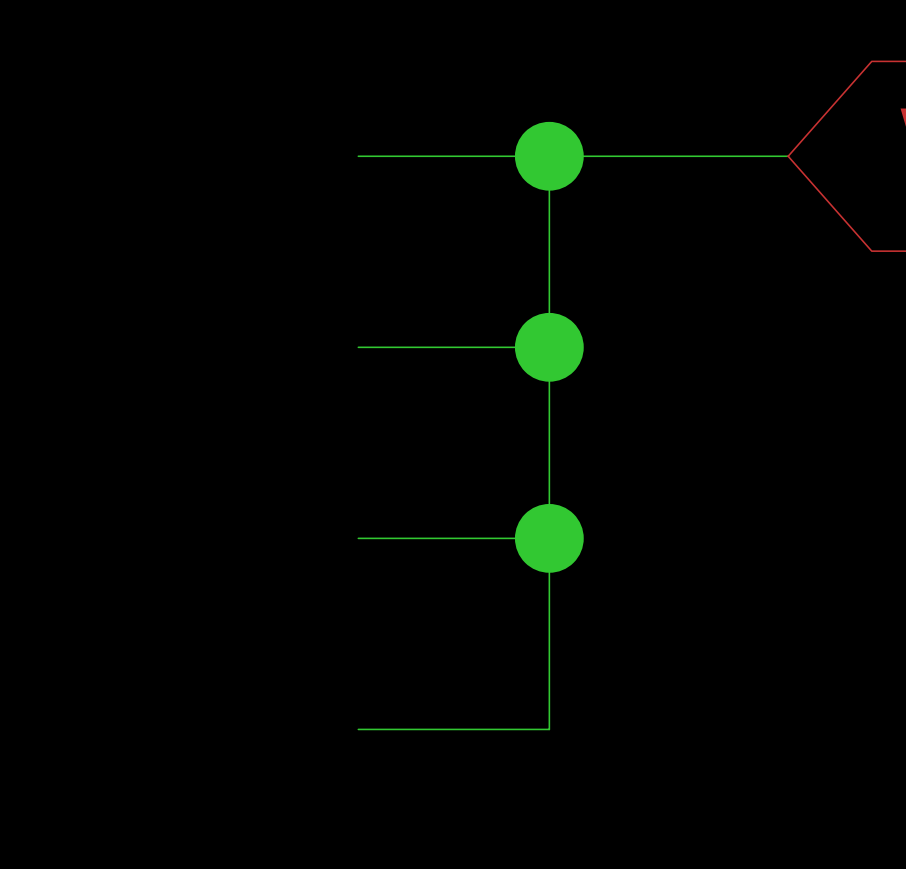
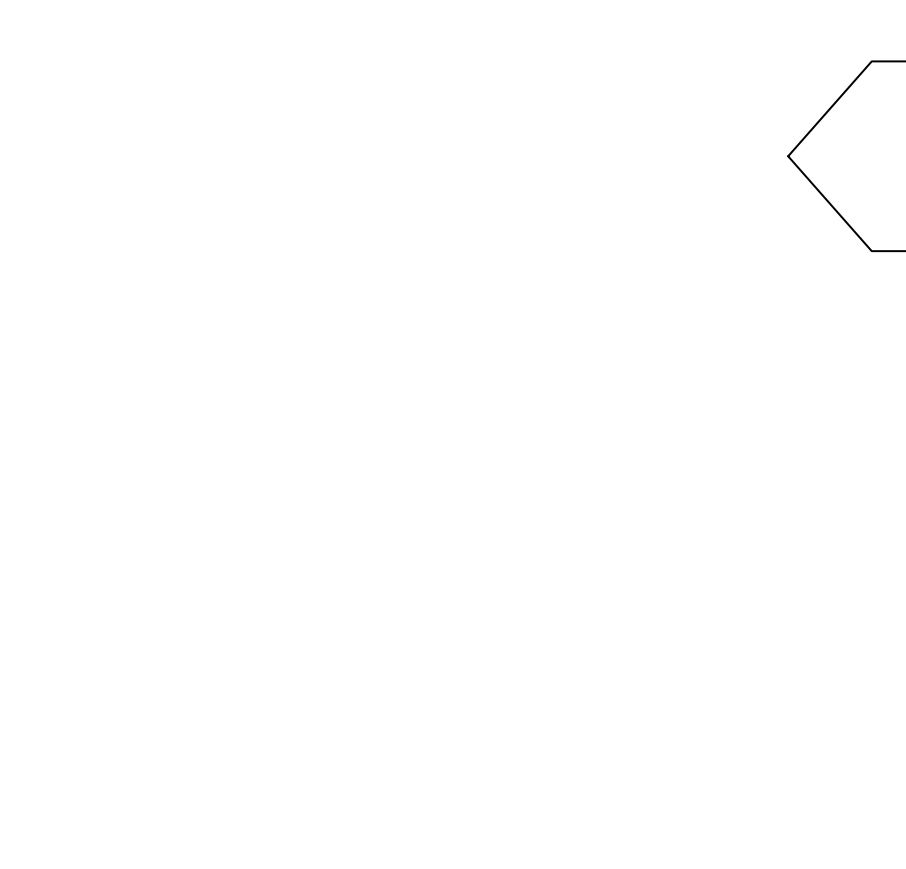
wire: (358, 156) (788, 156) -> none
wire: (549, 156) (549, 729) (358, 729) -> none
junction: (549, 156) -> none
wire: (358, 347) (549, 347) -> none
junction: (549, 347) -> none
wire: (358, 538) (549, 538) -> none
junction: (549, 538) -> none

